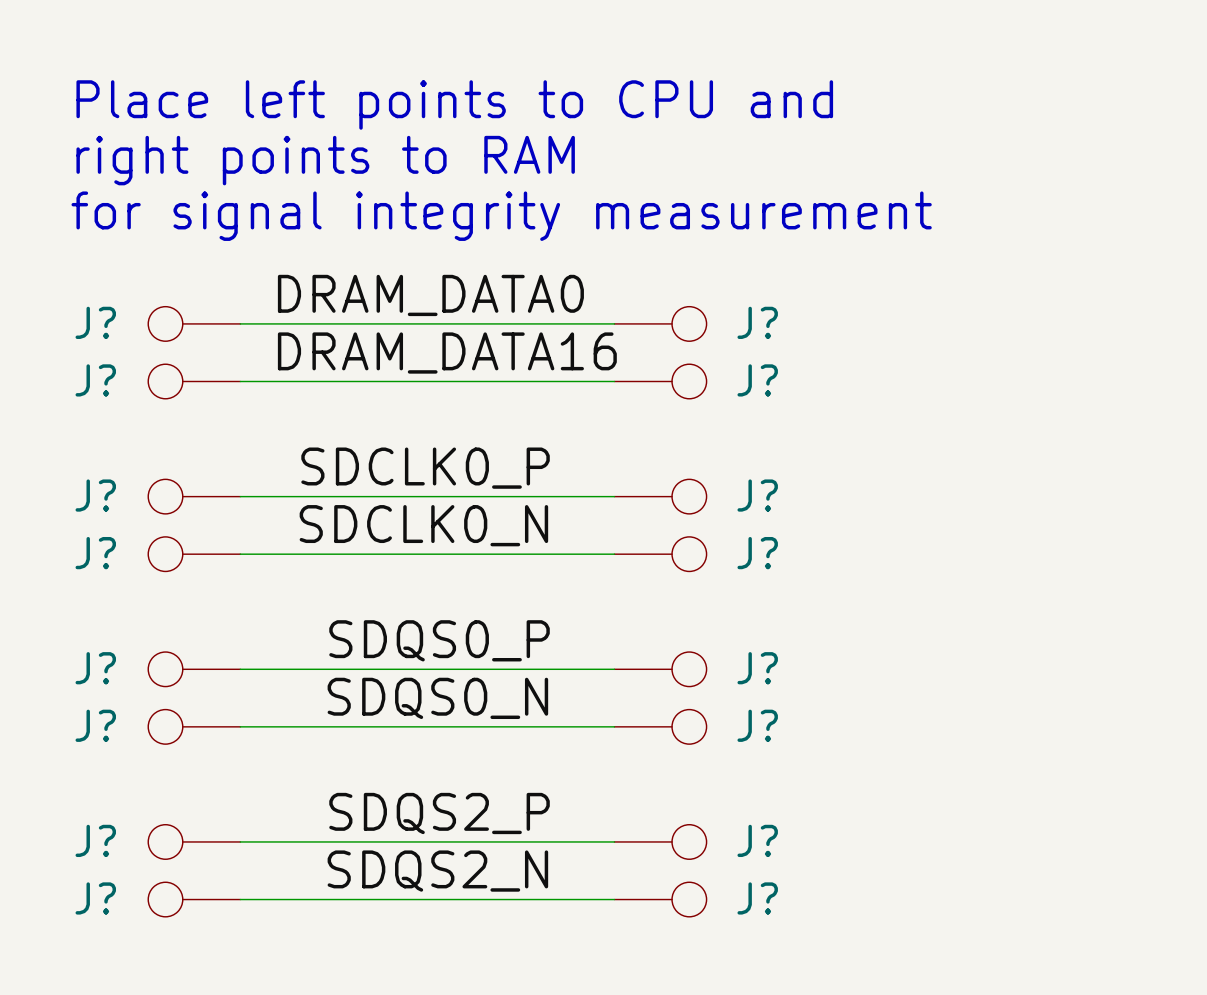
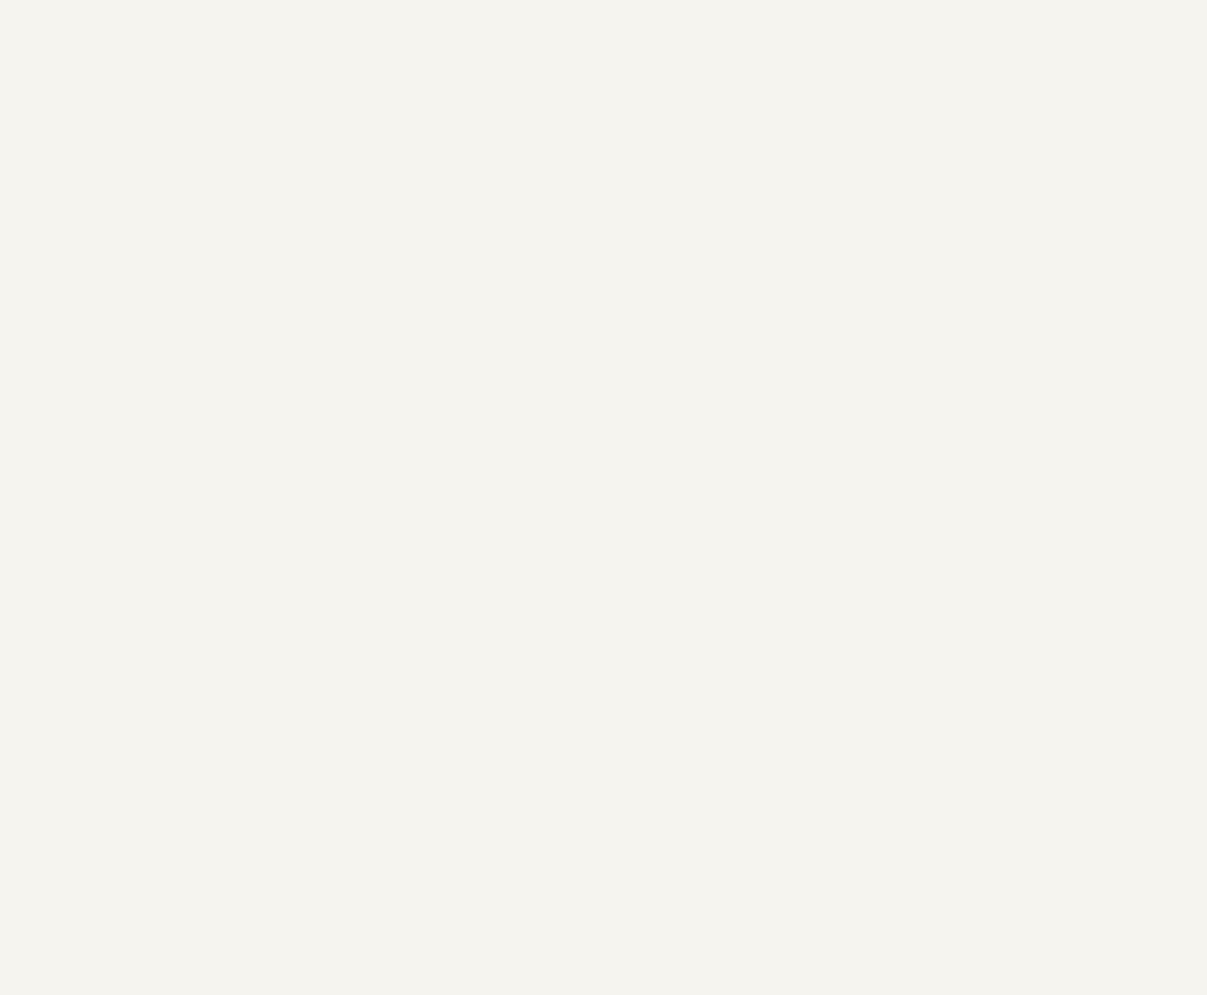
text: Place left points to CPU and (454, 104) -> none
text: right points to RAM (325, 160) -> none
text: for signal integrity measurement (501, 216) -> none
label: DRAM_DATA0 (430, 295) -> none
J?: (194, 323) -> none
wire: (240, 323) (614, 323) -> none
J?: (660, 323) -> none
label: DRAM_DATA16 (447, 353) -> none
J?: (194, 381) -> none
wire: (240, 381) (614, 381) -> none
J?: (660, 381) -> none
label: SDCLK0_P (425, 468) -> none
J?: (194, 496) -> none
wire: (240, 496) (614, 496) -> none
J?: (660, 496) -> none
label: SDCLK0_N (423, 525) -> none
J?: (194, 554) -> none
wire: (240, 554) (614, 554) -> none
J?: (660, 554) -> none
label: SDQS0_P (439, 640) -> none
J?: (194, 669) -> none
wire: (240, 669) (614, 669) -> none
J?: (660, 669) -> none
label: SDQS0_N (437, 698) -> none
J?: (194, 726) -> none
wire: (240, 726) (614, 726) -> none
J?: (660, 726) -> none
label: SDQS2_P (439, 813) -> none
J?: (194, 841) -> none
wire: (240, 841) (614, 841) -> none
J?: (660, 841) -> none
label: SDQS2_N (437, 871) -> none
J?: (194, 899) -> none
wire: (240, 899) (614, 899) -> none
J?: (660, 899) -> none

